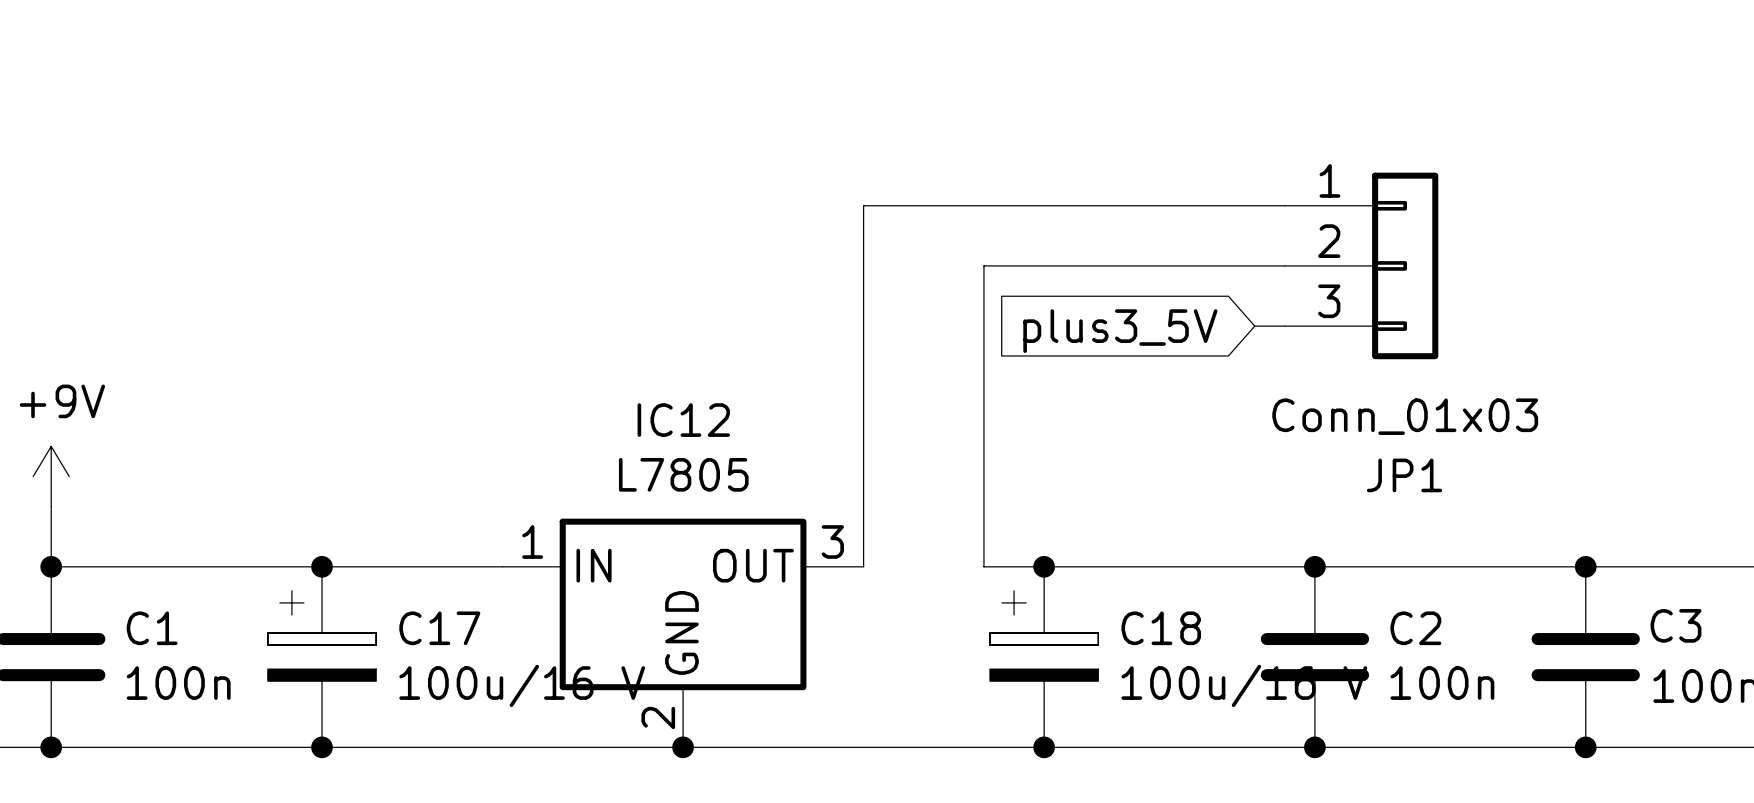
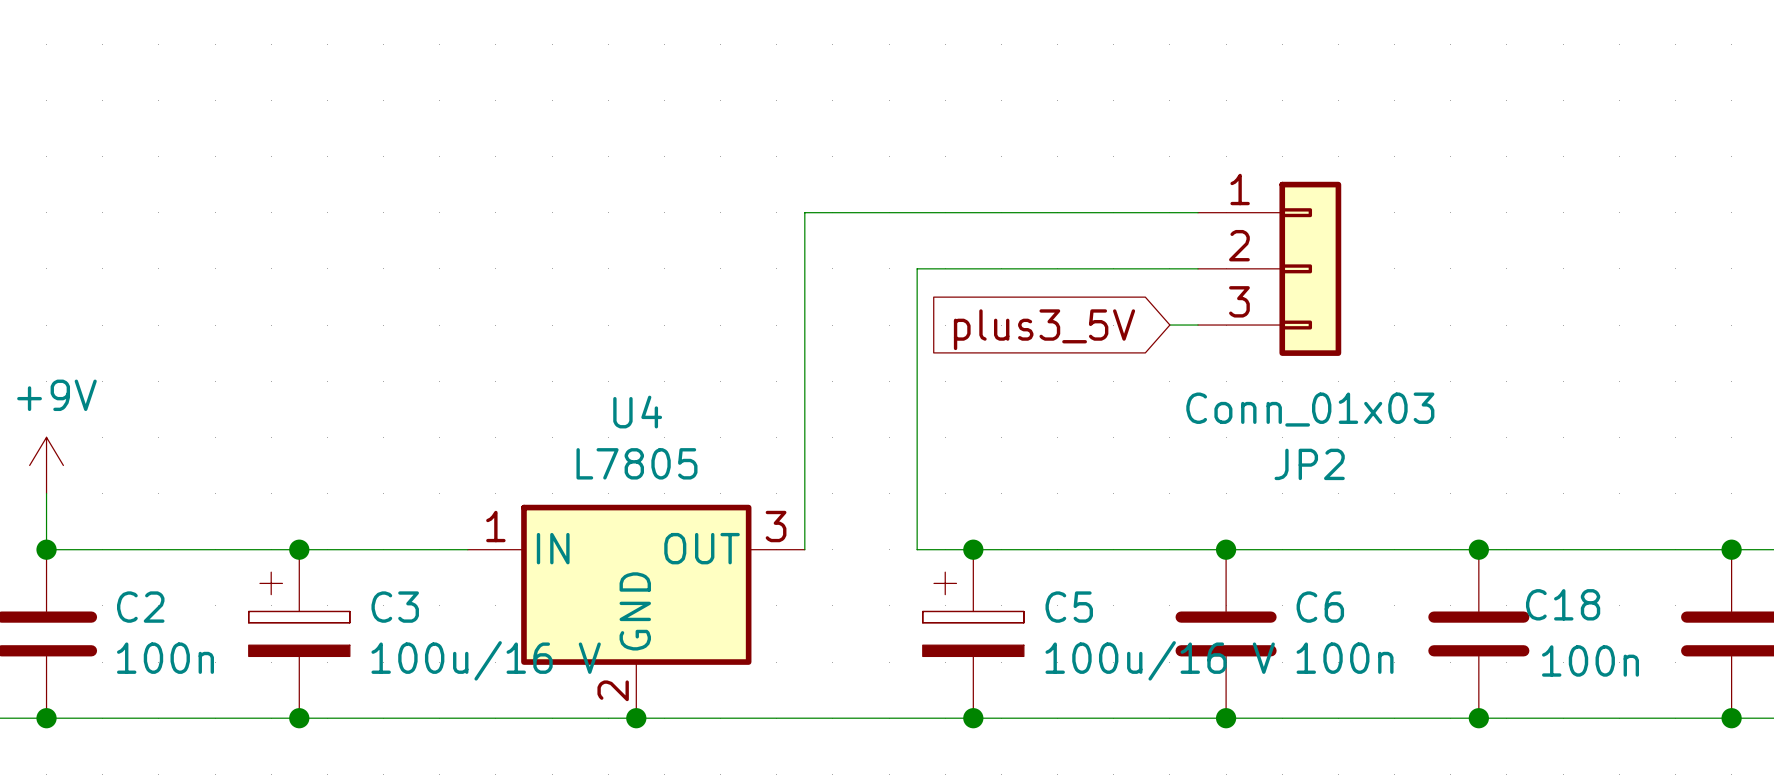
IC12 name: IC12 (683, 420) -> U4 (637, 412)
JP1 name: JP1 (1404, 475) -> JP2 (1309, 464)
C3 name: C3 (1676, 625) -> C18 (1563, 604)
C1 name: C1 (152, 628) -> C2 (140, 607)
C17 name: C17 (439, 628) -> C3 (395, 607)
C18 name: C18 (1161, 628) -> C5 (1069, 607)
C2 name: C2 (1415, 628) -> C6 (1320, 607)

